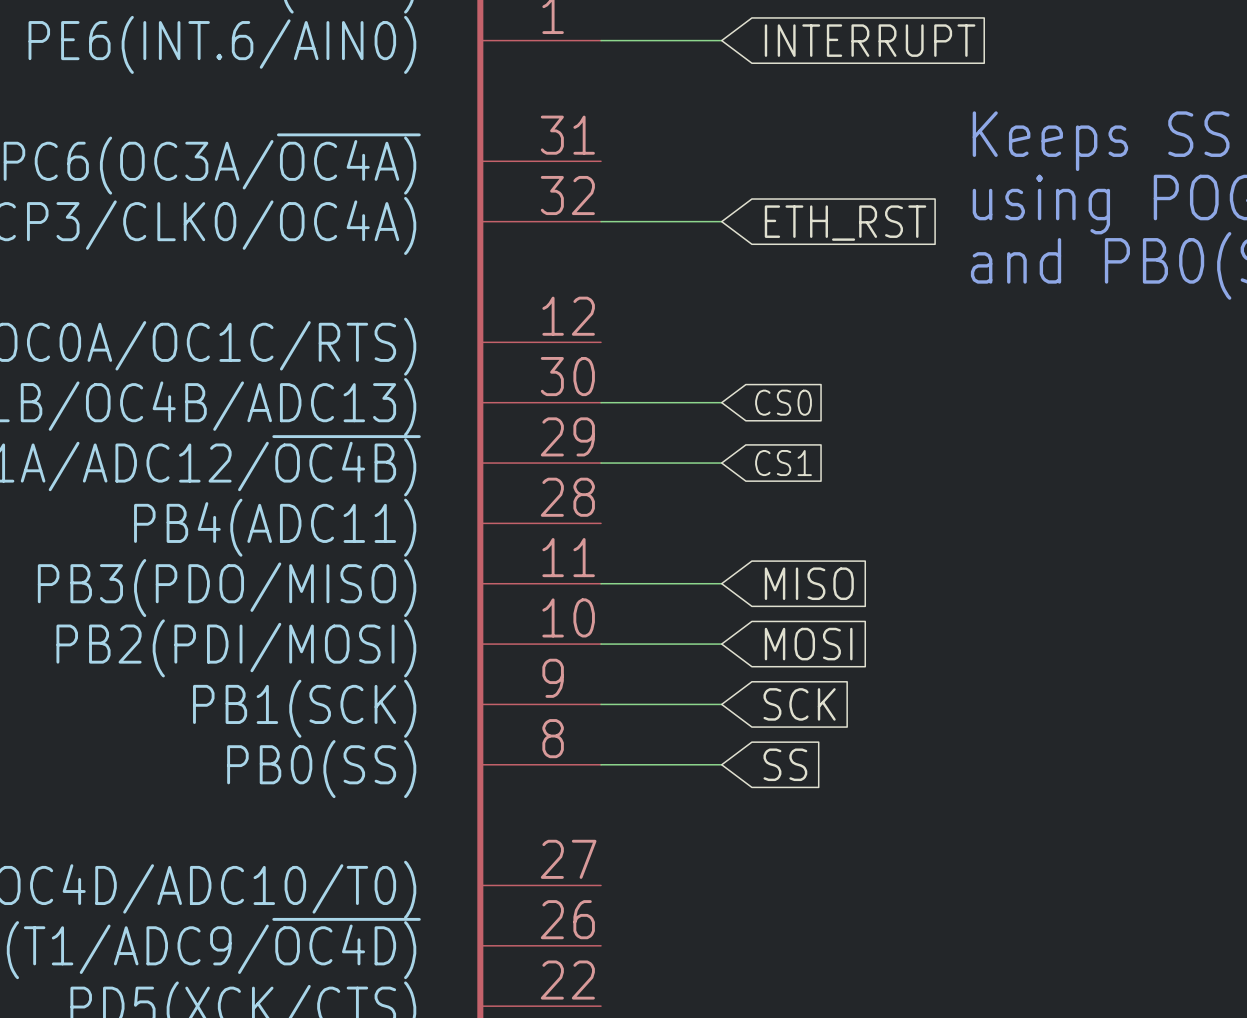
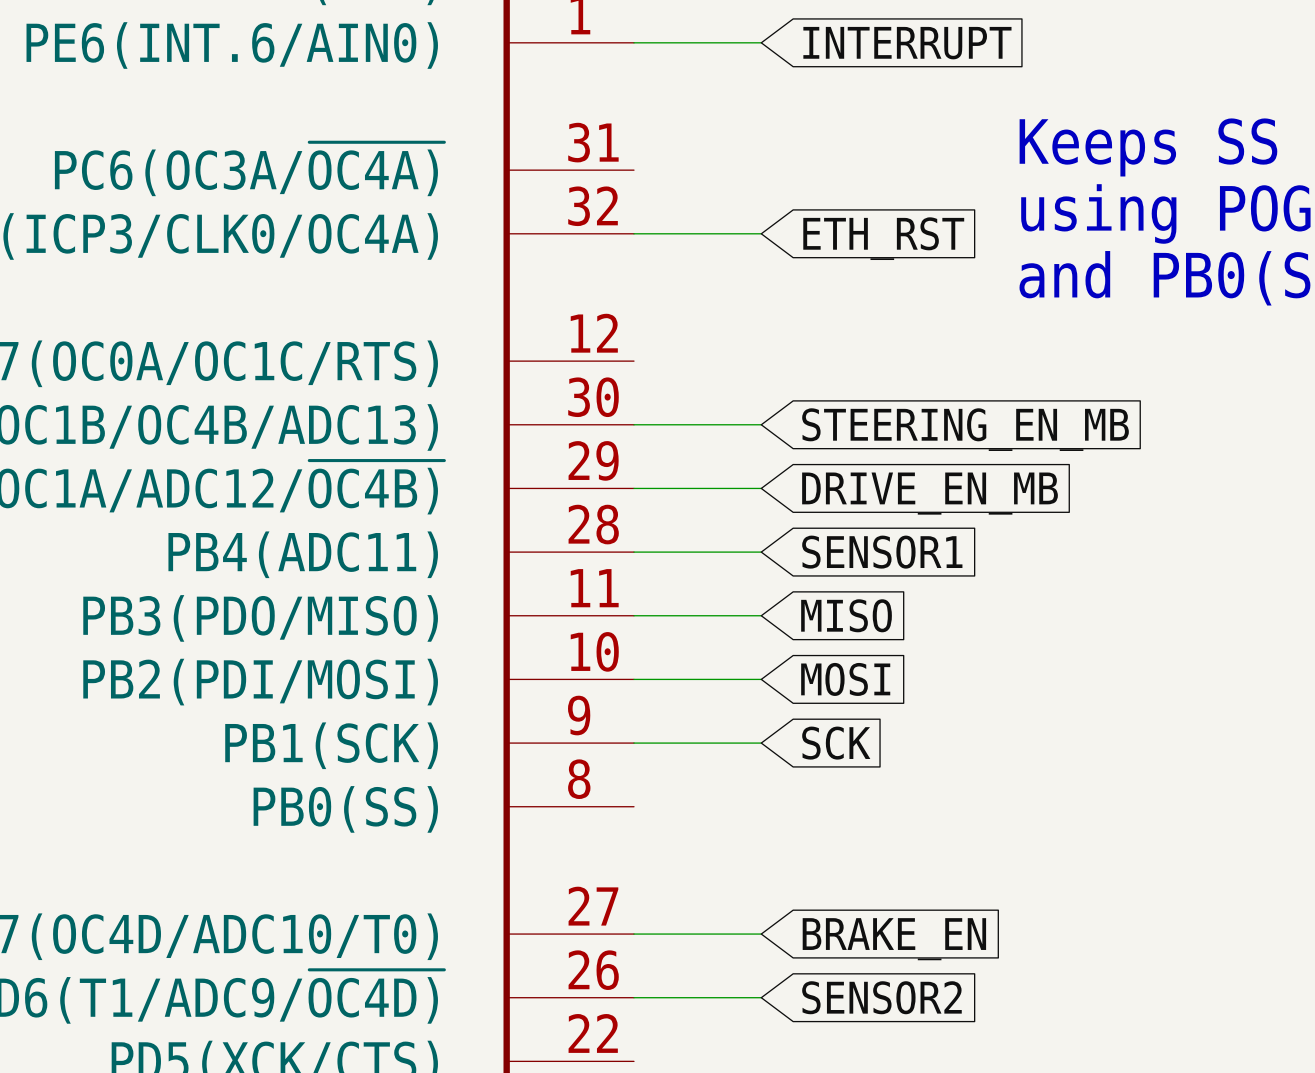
global label: CS0 (783, 402) -> STEERING_EN_MB (965, 429)
global label: CS1 (783, 463) -> DRIVE_EN_MB (930, 493)
wire: none -> (633, 552) (761, 552)
global label: none -> SENSOR1 (882, 552)
wire: (601, 764) (721, 764) -> (633, 934) (761, 934)
global label: SS (785, 764) -> none
global label: none -> BRAKE_EN (894, 939)
wire: none -> (633, 997) (761, 997)
global label: none -> SENSOR2 (881, 997)

